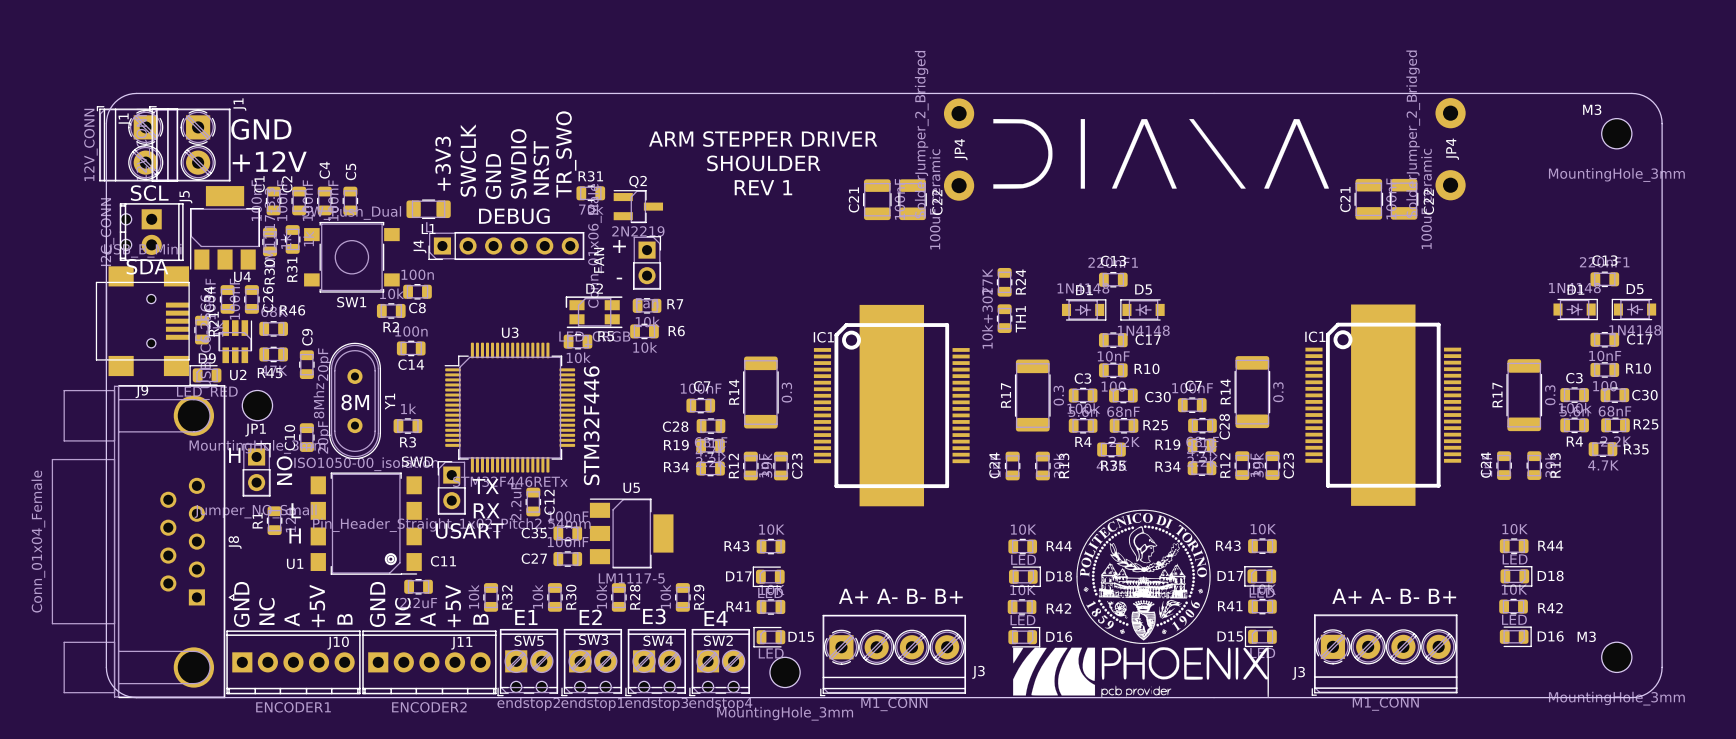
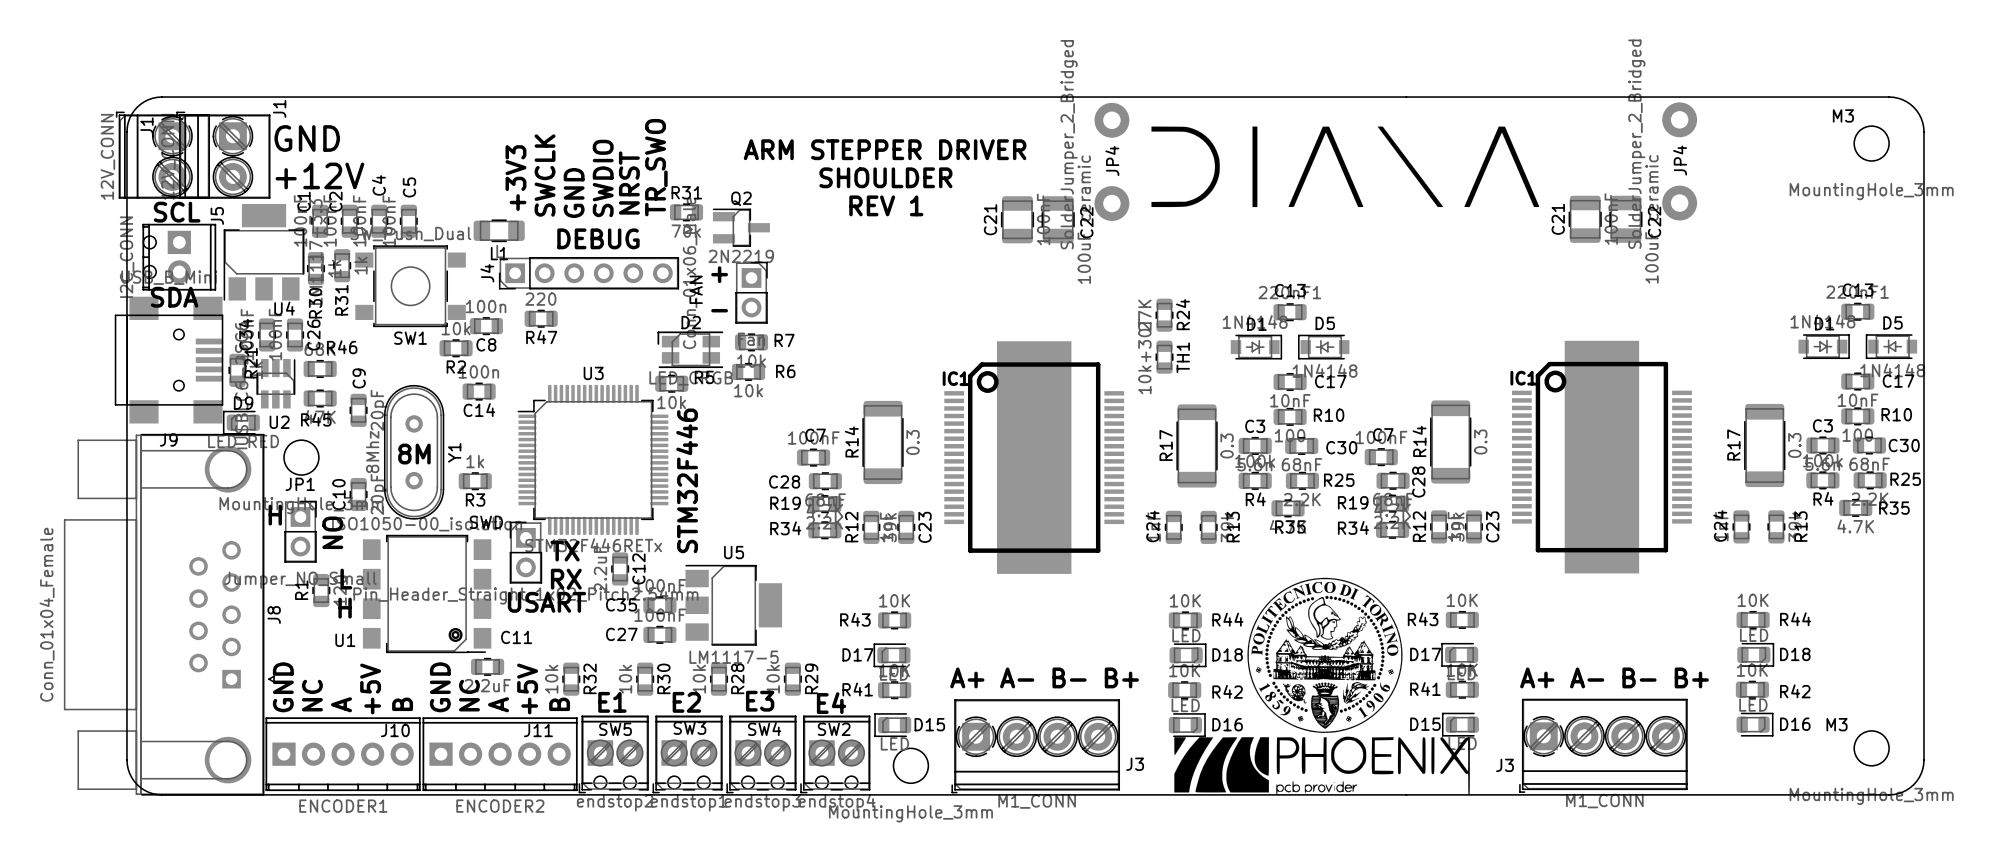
R47: none -> 220 (541, 318)

